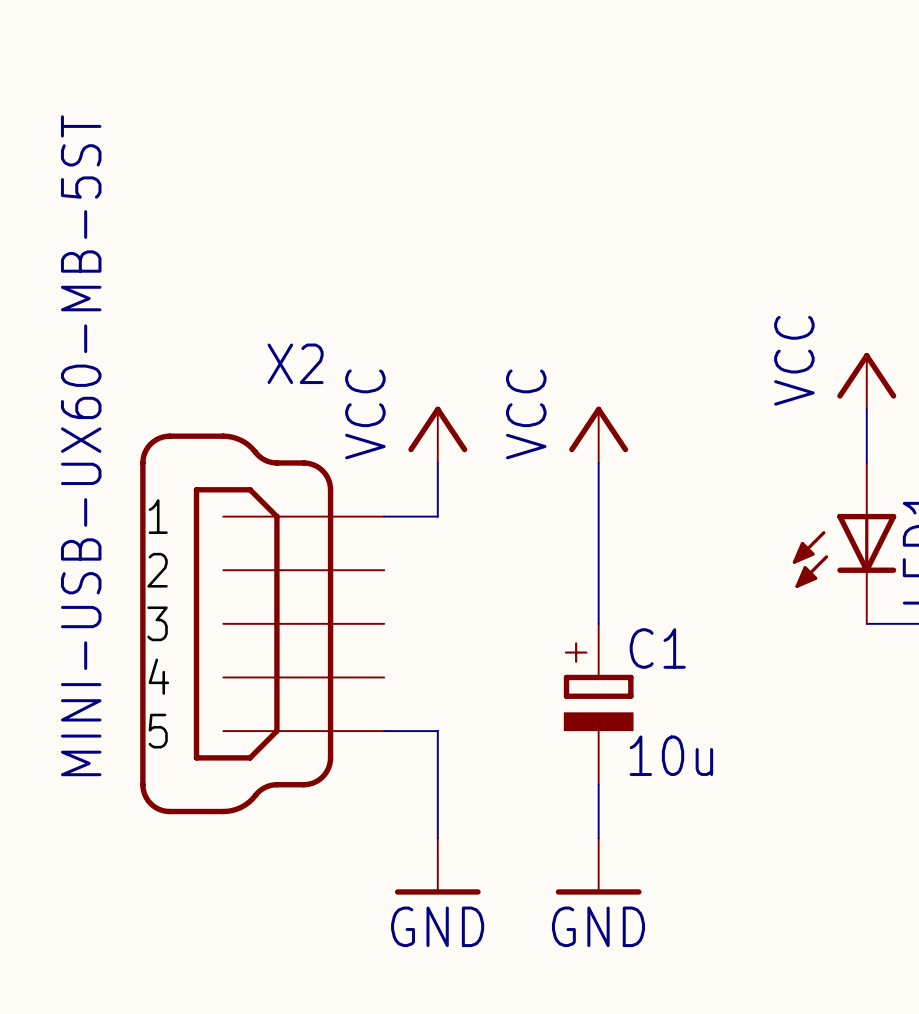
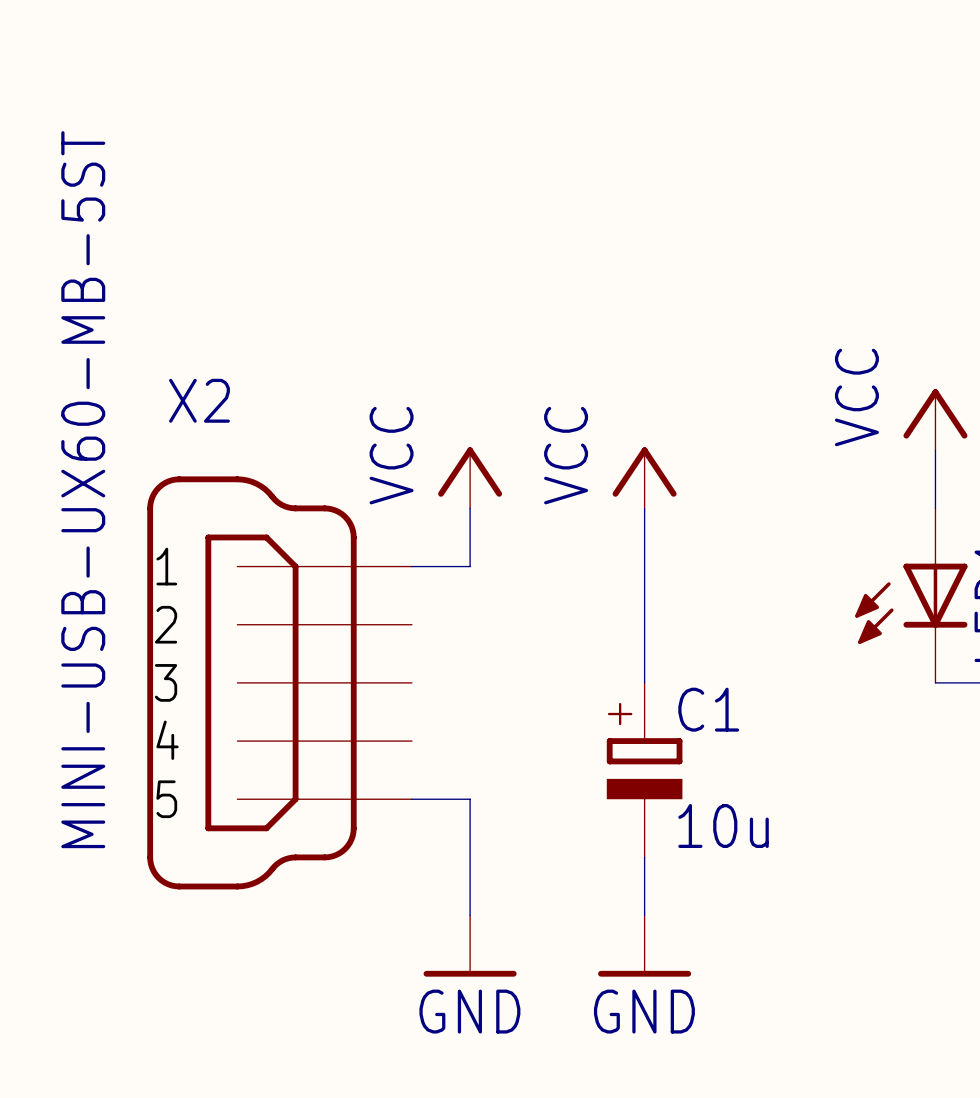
X2 name position: X2 (295, 363) -> X2 (199, 400)

